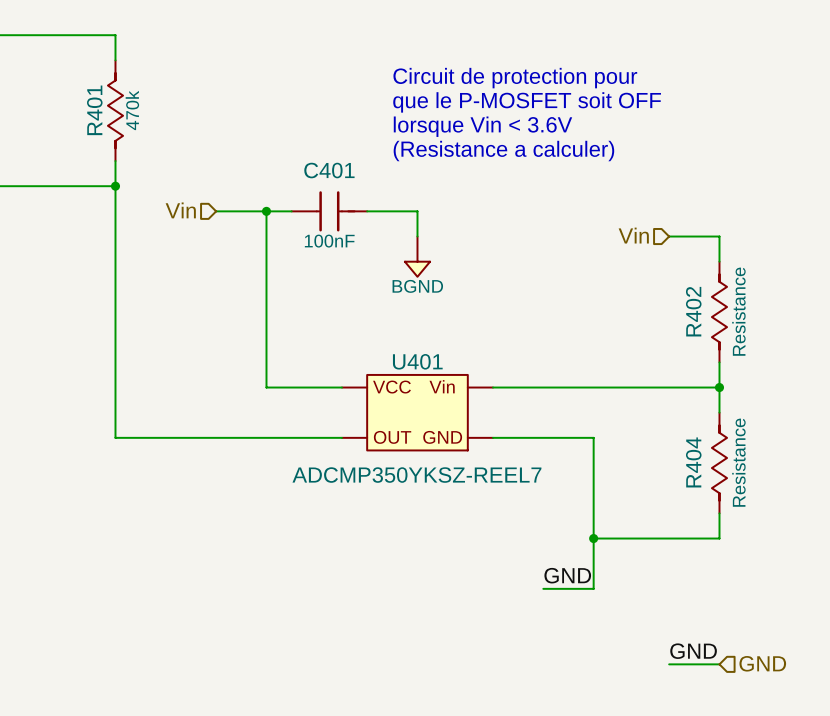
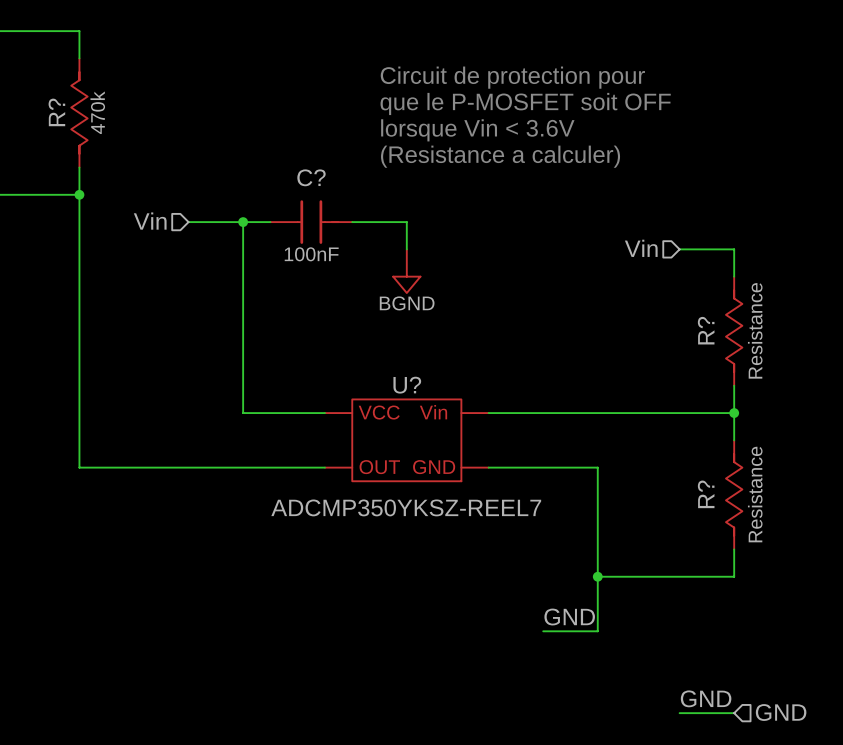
R401 name: R401 (94, 110) -> R? (56, 112)
C401 name: C401 (329, 170) -> C? (311, 177)
R402 name: R402 (693, 311) -> R? (706, 330)
U401 name: U401 (417, 361) -> U? (407, 385)
R404 name: R404 (693, 462) -> R? (706, 494)

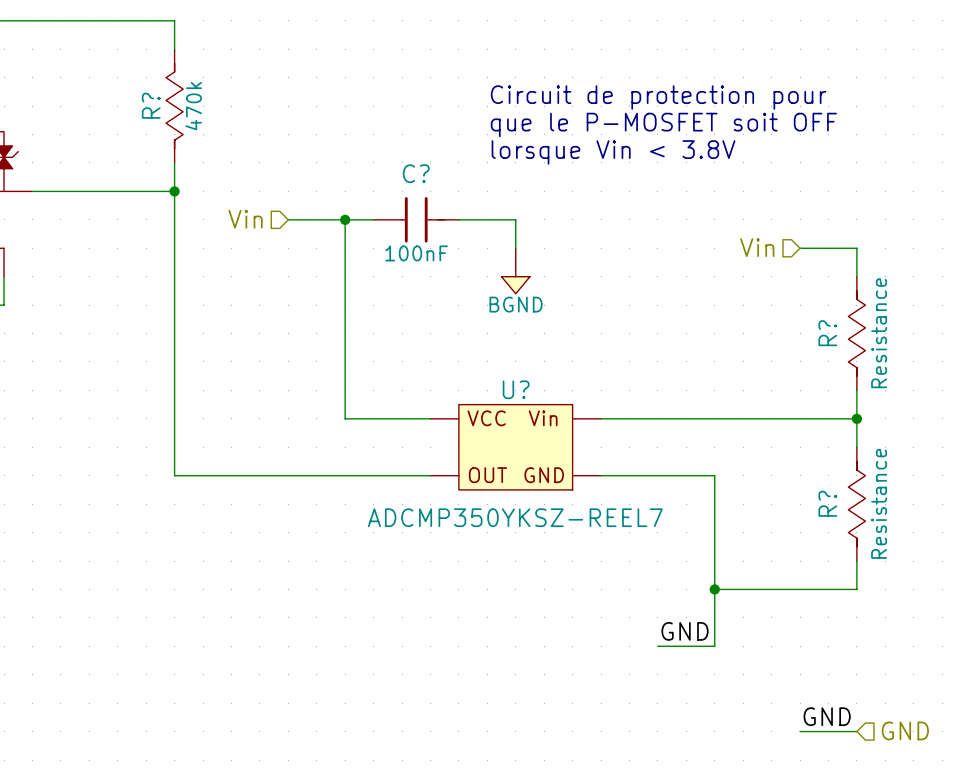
text: Circuit de protection pour (512, 77) -> none
text: que le P-MOSFET soit OFF (525, 103) -> Circuit de protection pour (658, 97)
text: lorsque Vin < 3.6V (477, 130) -> que le P-MOSFET soit OFF (663, 124)
text: (Resistance a calculer) (500, 156) -> lorsque Vin < 3.8V (613, 152)

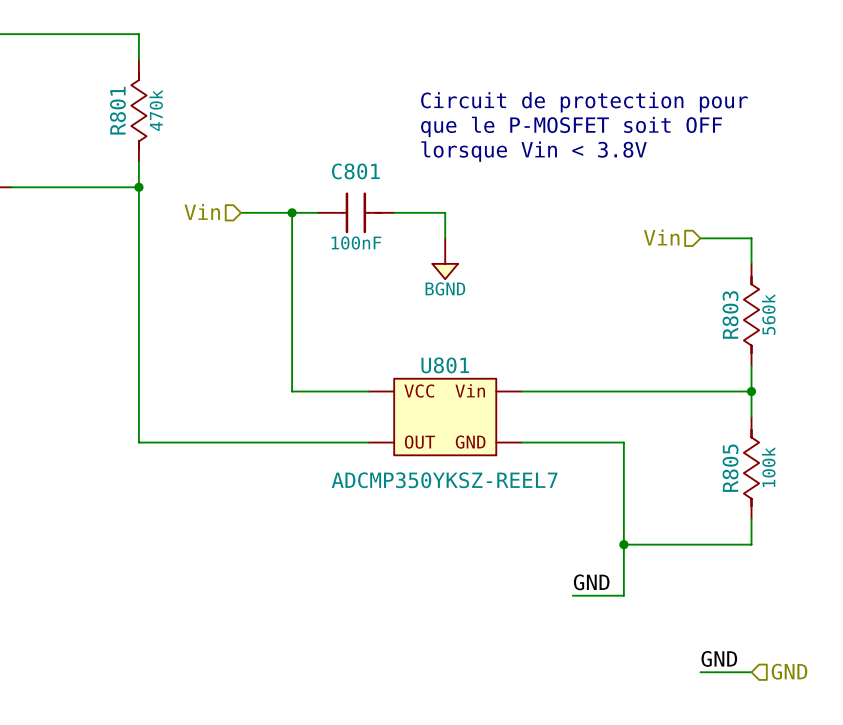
R? name: R? (151, 105) -> R801 (117, 110)
C? name: C? (416, 173) -> C801 (355, 171)
R?: (856, 333) -> none
R803: none -> (751, 314)
U? name: U? (516, 389) -> U801 (445, 365)
R?: (856, 504) -> none
R805: none -> (751, 468)

